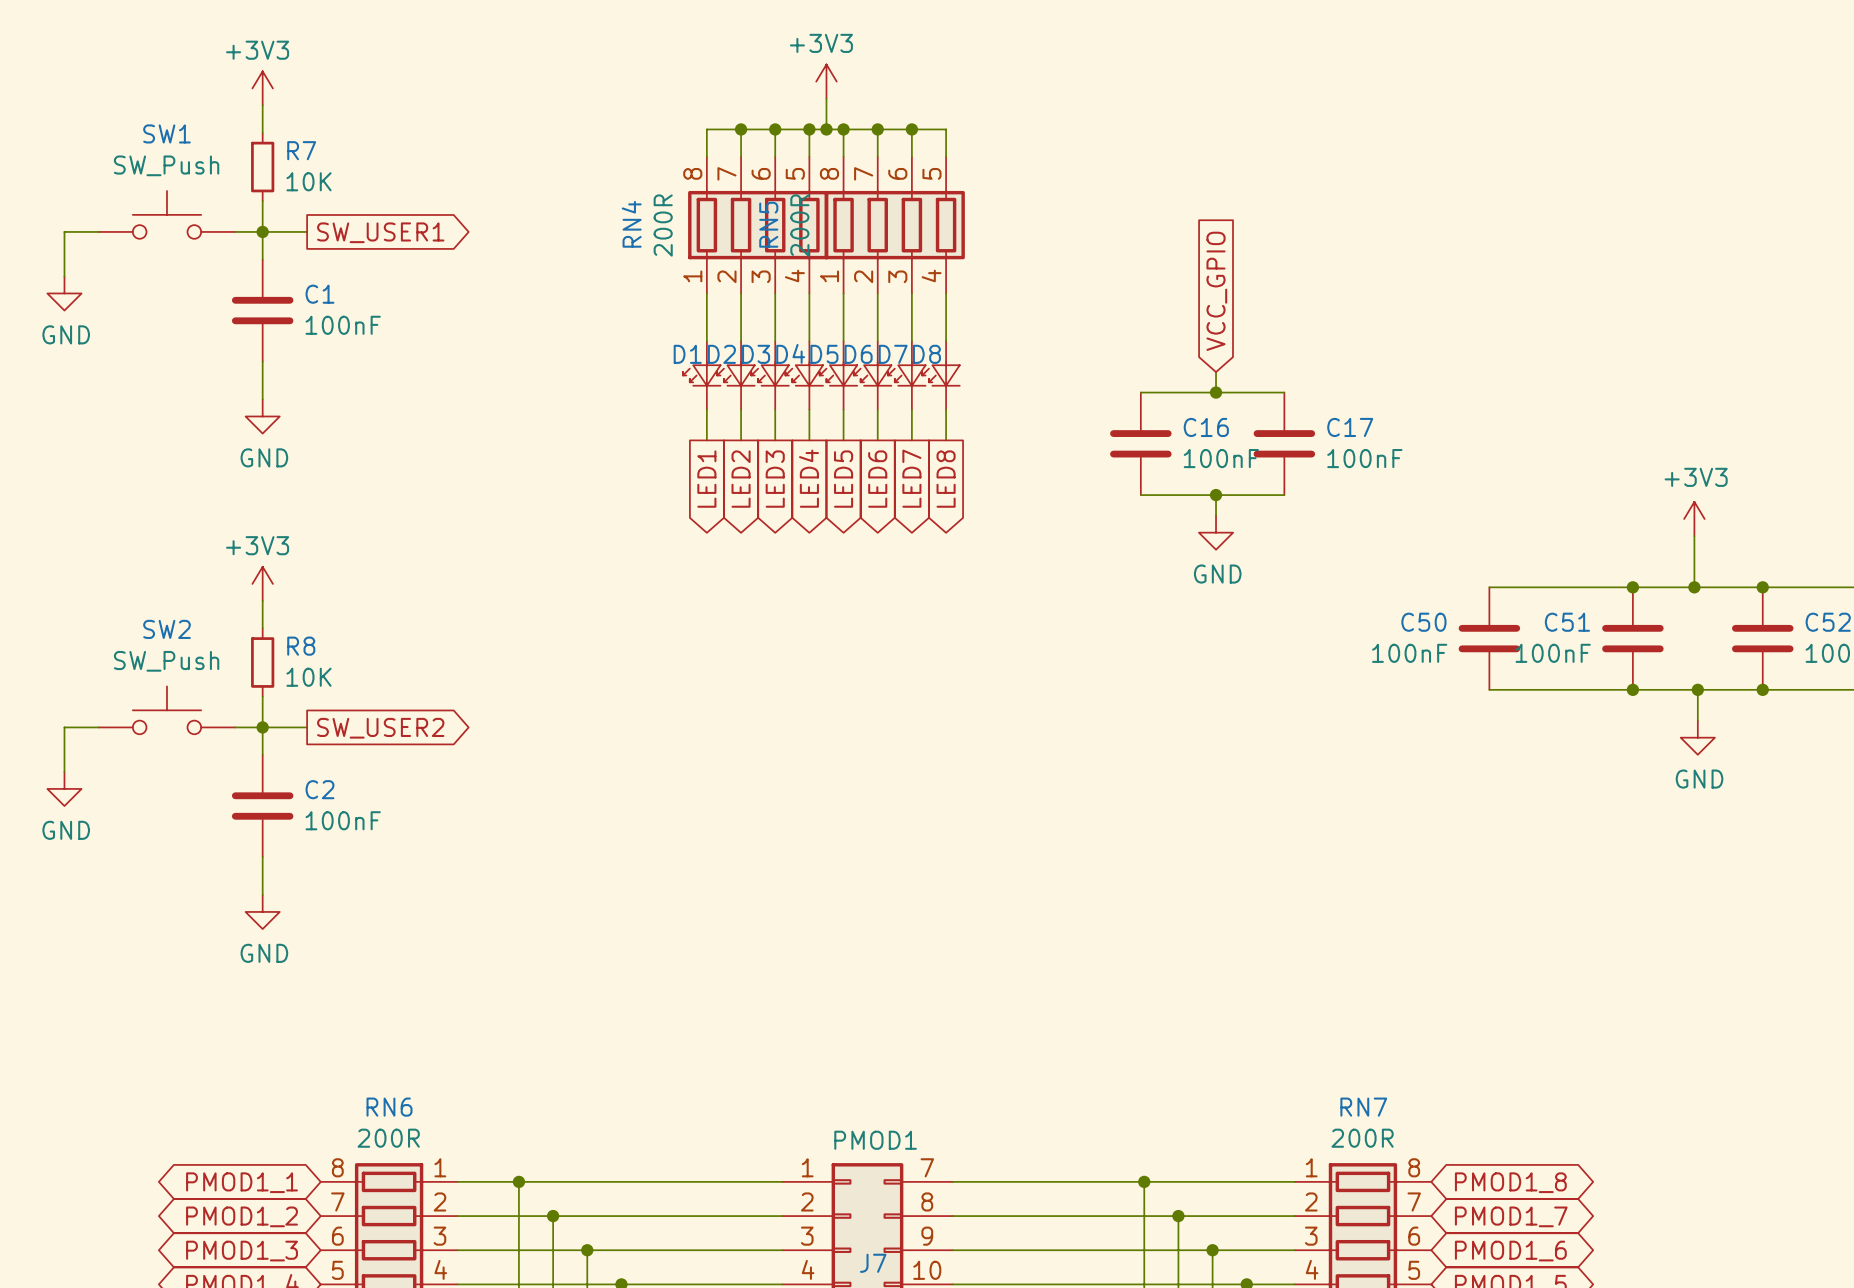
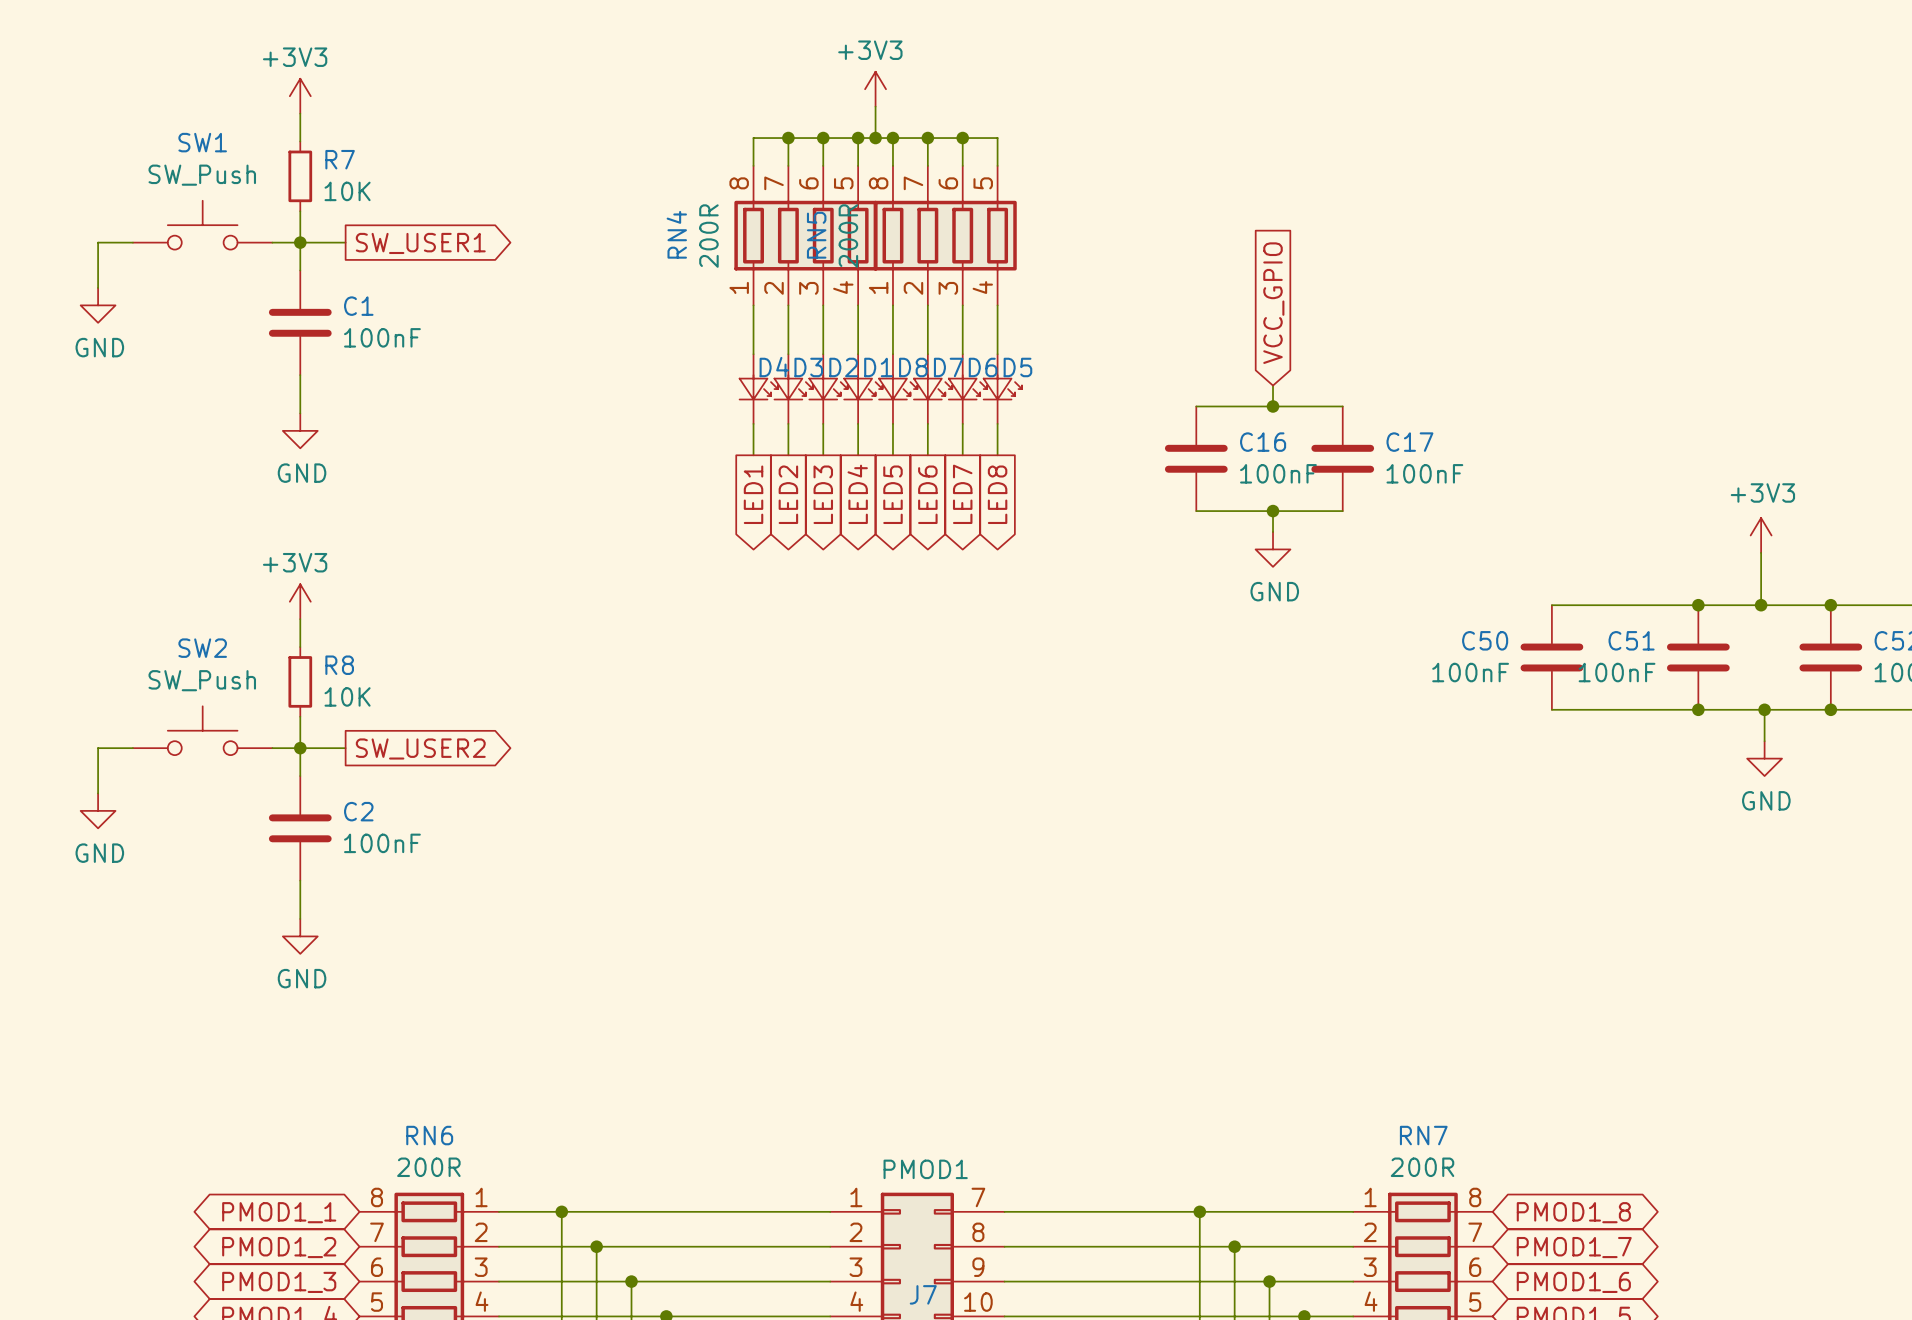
D1 flip: as is (701, 373) -> left-right (863, 387)
D2 flip: as is (735, 373) -> left-right (828, 387)
D3 flip: as is (770, 373) -> left-right (793, 387)
D4 flip: as is (804, 373) -> left-right (758, 387)
D5 flip: as is (838, 373) -> left-right (1002, 387)
D6 flip: as is (872, 373) -> left-right (967, 387)
D7 flip: as is (906, 373) -> left-right (933, 387)
D8 flip: as is (940, 373) -> left-right (898, 387)
D1 position: (701, 375) -> (863, 389)
D2 position: (735, 375) -> (828, 389)
D4 position: (804, 375) -> (758, 389)
D5 position: (838, 375) -> (1002, 389)
D6 position: (872, 375) -> (967, 389)
D8 position: (940, 375) -> (898, 389)

